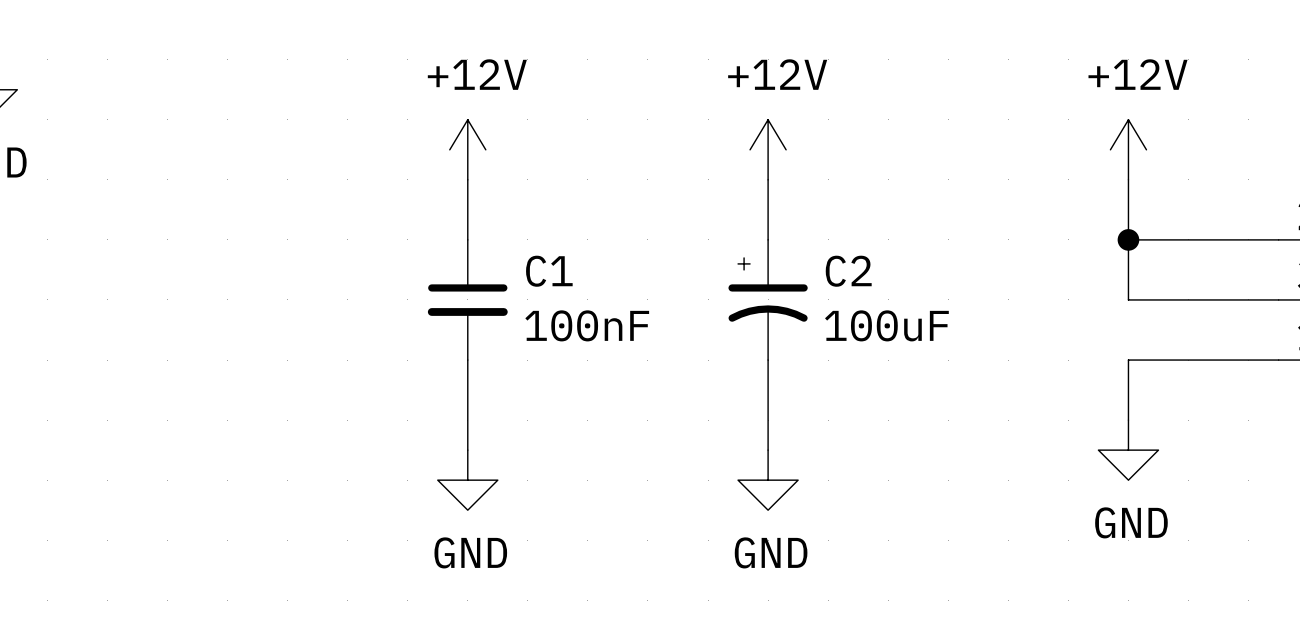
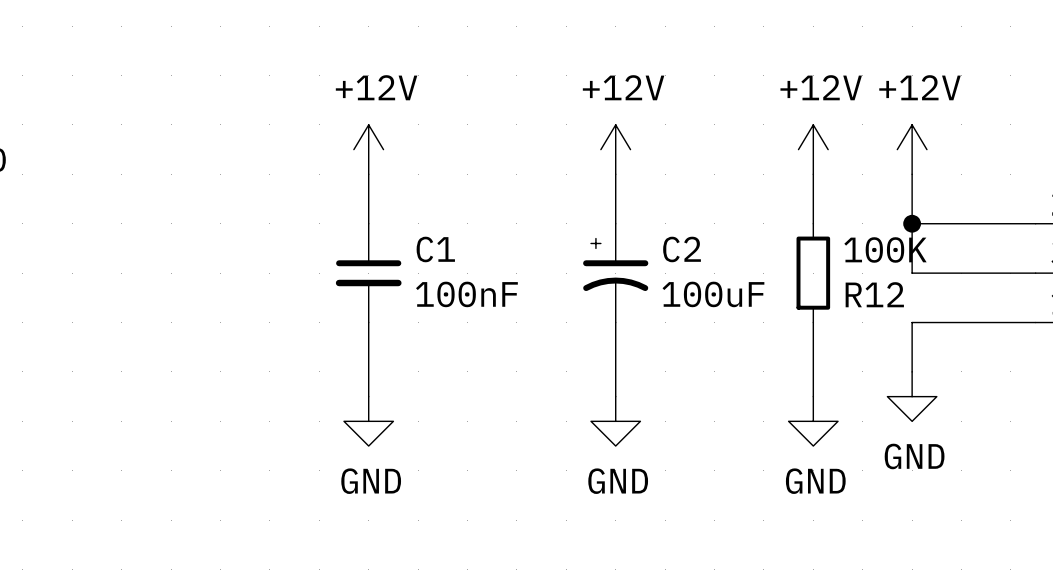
power symbol: none -> +12V (813, 149)
wire: none -> (813, 174) (813, 223)
R12: none -> 100K (813, 273)
wire: none -> (813, 322) (813, 396)
power symbol: none -> GND (813, 421)

